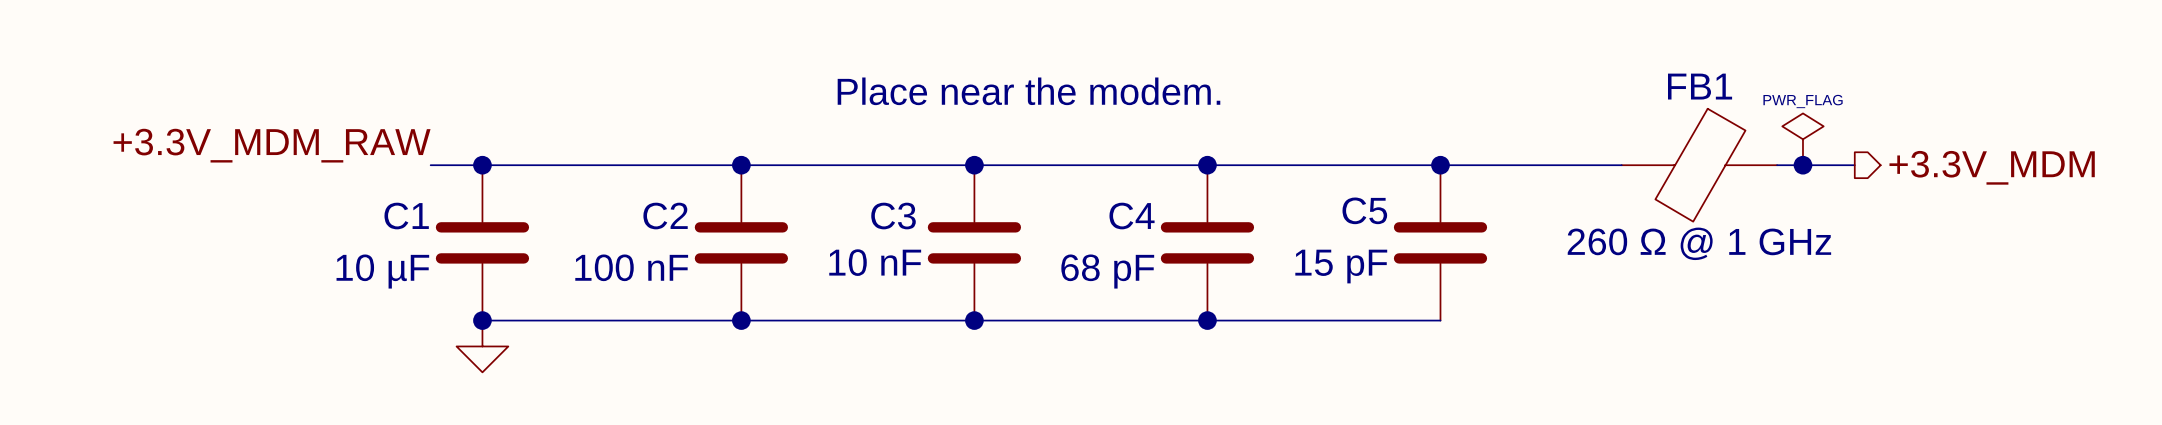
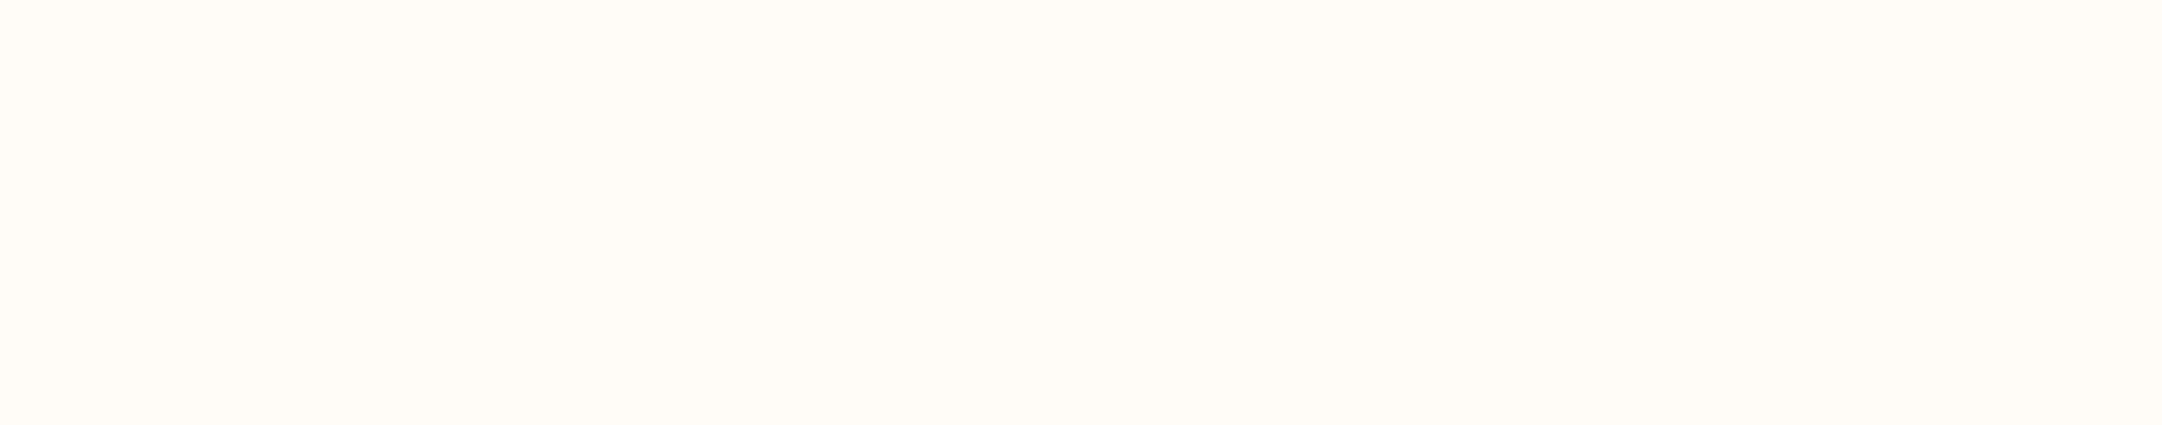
text: Place near the modem. (1028, 91) -> none
power symbol: PWR_FLAG (1802, 139) -> none
label: +3.3V_MDM_RAW (272, 145) -> none
wire: (430, 165) (1621, 165) -> none
junction: (482, 165) -> none
junction: (741, 165) -> none
junction: (974, 165) -> none
junction: (1207, 165) -> none
junction: (1440, 165) -> none
FB1: 260 Ω @ 1 GHz (1699, 165) -> none
wire: (1777, 165) (1854, 165) -> none
junction: (1802, 165) -> none
hierarchical label: +3.3V_MDM (1992, 167) -> none
C1: 10 µF (482, 242) -> none
C2: 100 nF (741, 242) -> none
C3: 10 nF (974, 242) -> none
C4: 68 pF (1207, 242) -> none
C5: 15 pF (1440, 242) -> none
wire: (482, 320) (1440, 320) -> none
junction: (482, 320) -> none
junction: (741, 320) -> none
junction: (974, 320) -> none
junction: (1207, 320) -> none
power symbol: (482, 346) -> none

